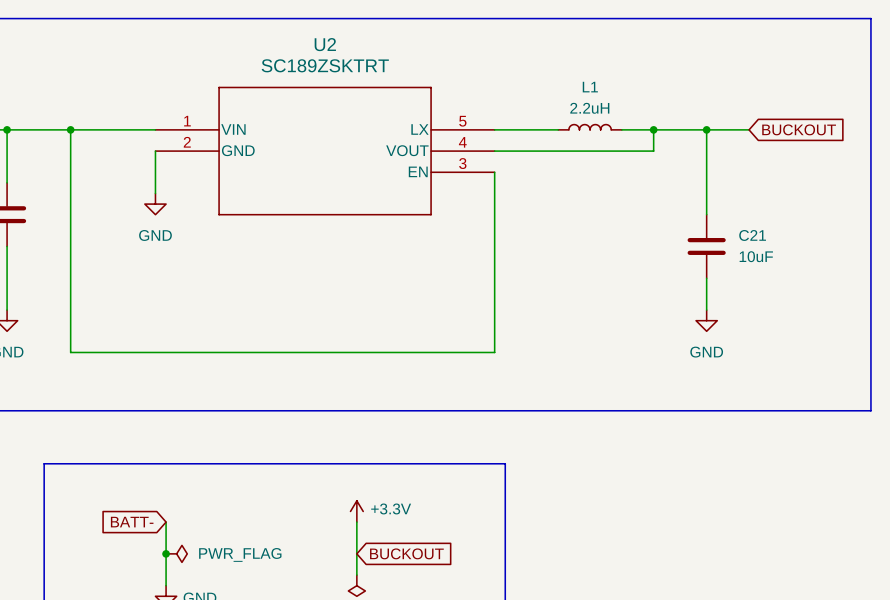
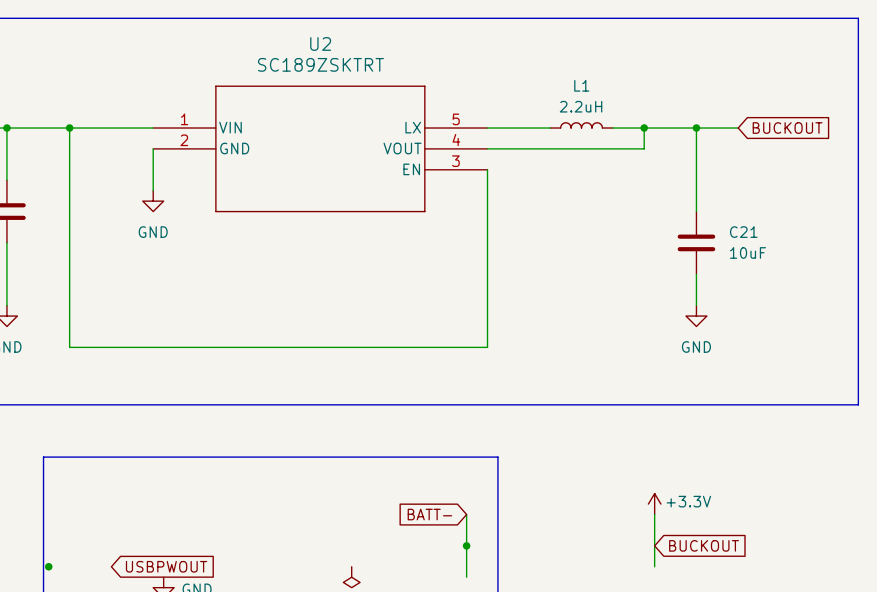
power symbol: +3.3V (356, 511) -> none
power symbol: none -> +3.3V (654, 504)
global label: BATT- (132, 522) -> none
wire: (166, 522) (166, 585) -> none
wire: (356, 522) (356, 575) -> none
global label: none -> BATT- (429, 514)
wire: none -> (466, 514) (466, 577)
wire: none -> (654, 514) (654, 566)
junction: (166, 553) -> none
power symbol: PWR_FLAG (176, 553) -> none
global label: BUCKOUT (406, 553) -> none
junction: none -> (466, 545)
global label: none -> BUCKOUT (704, 545)
junction: none -> (48, 566)
global label: none -> USBPWOUT (166, 566)

